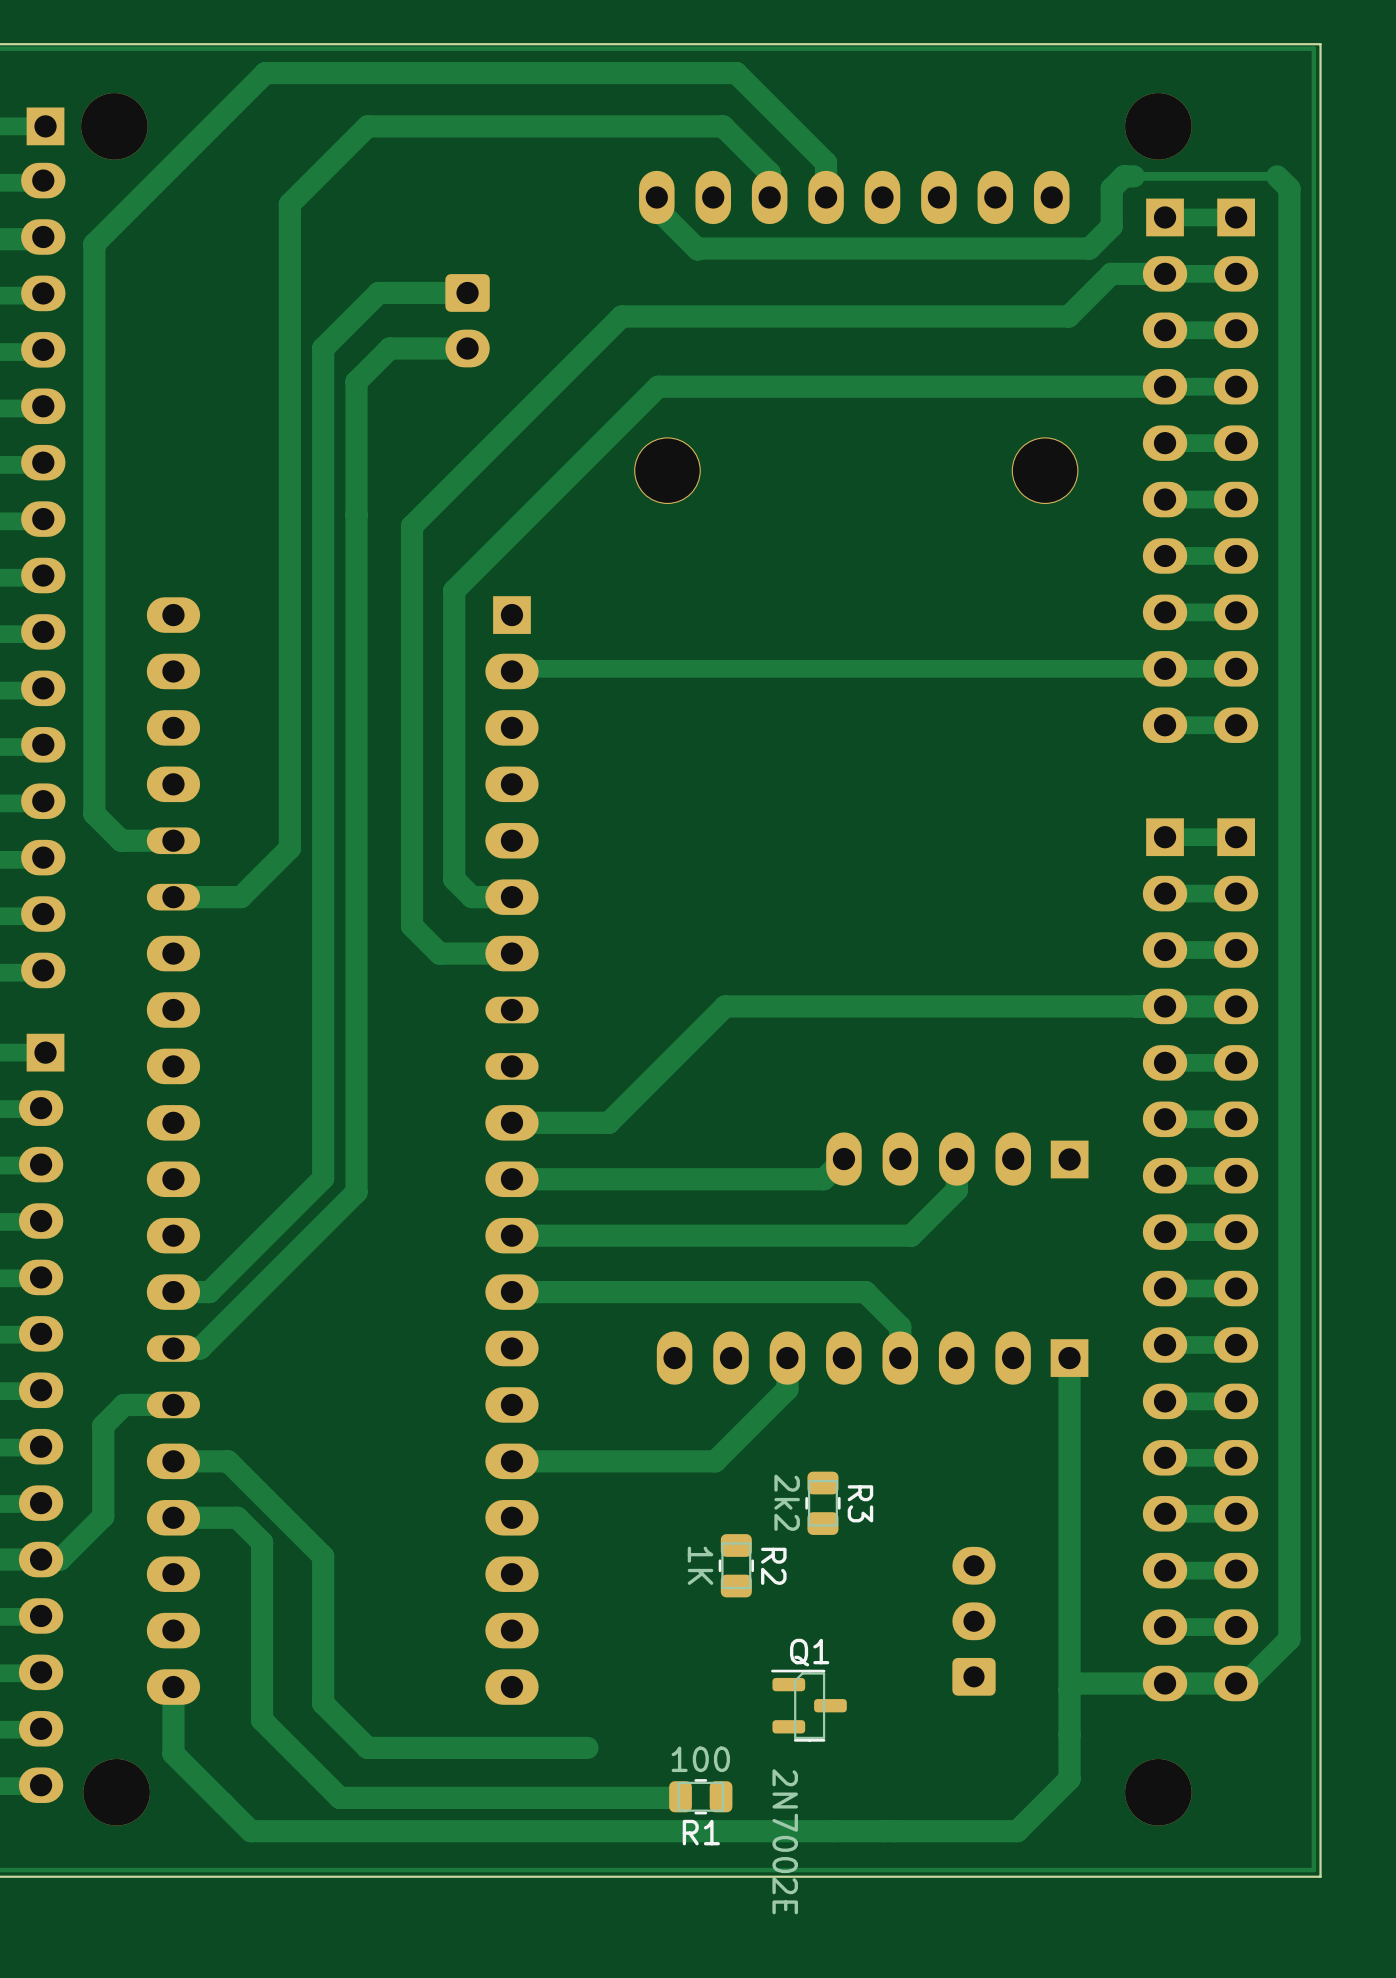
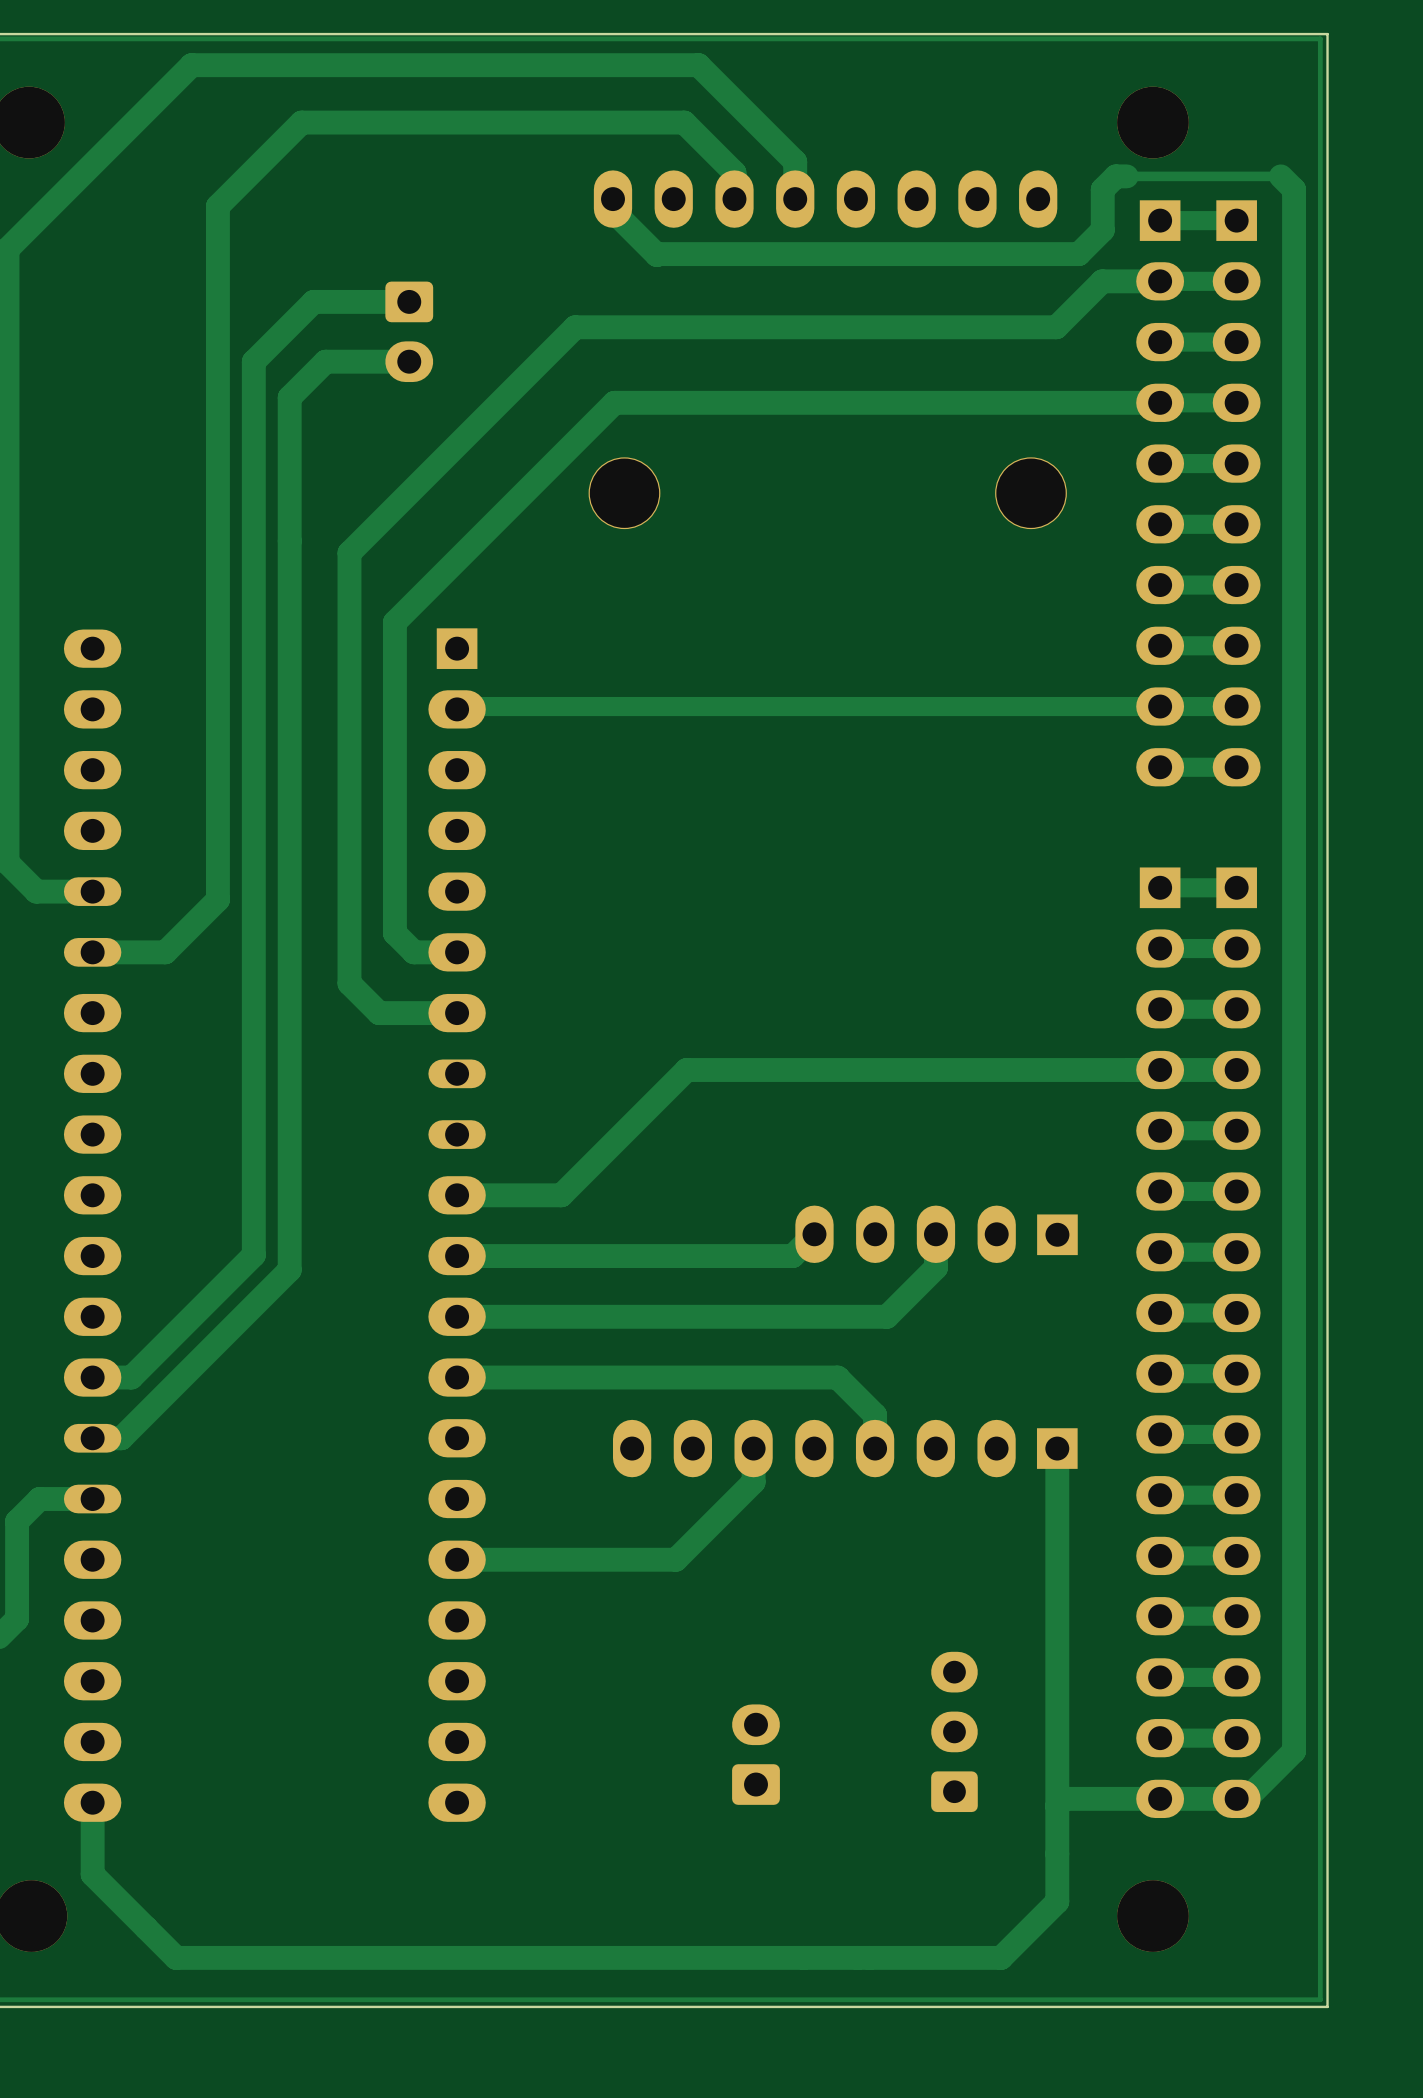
track: (173, 1461) (228, 1461) (323, 1556) (323, 1703) (367, 1747) (587, 1747) -> none
R3: 2k2 (822, 1503) -> none
track: (173, 1517) (237, 1517) (262, 1542) (262, 1720) (339, 1797) (680, 1796) -> none
R2: 1K (736, 1565) -> none
part: none -> (756, 1754)
Q1: 2N7002E (808, 1705) -> none
R1: 100 (700, 1796) -> none

